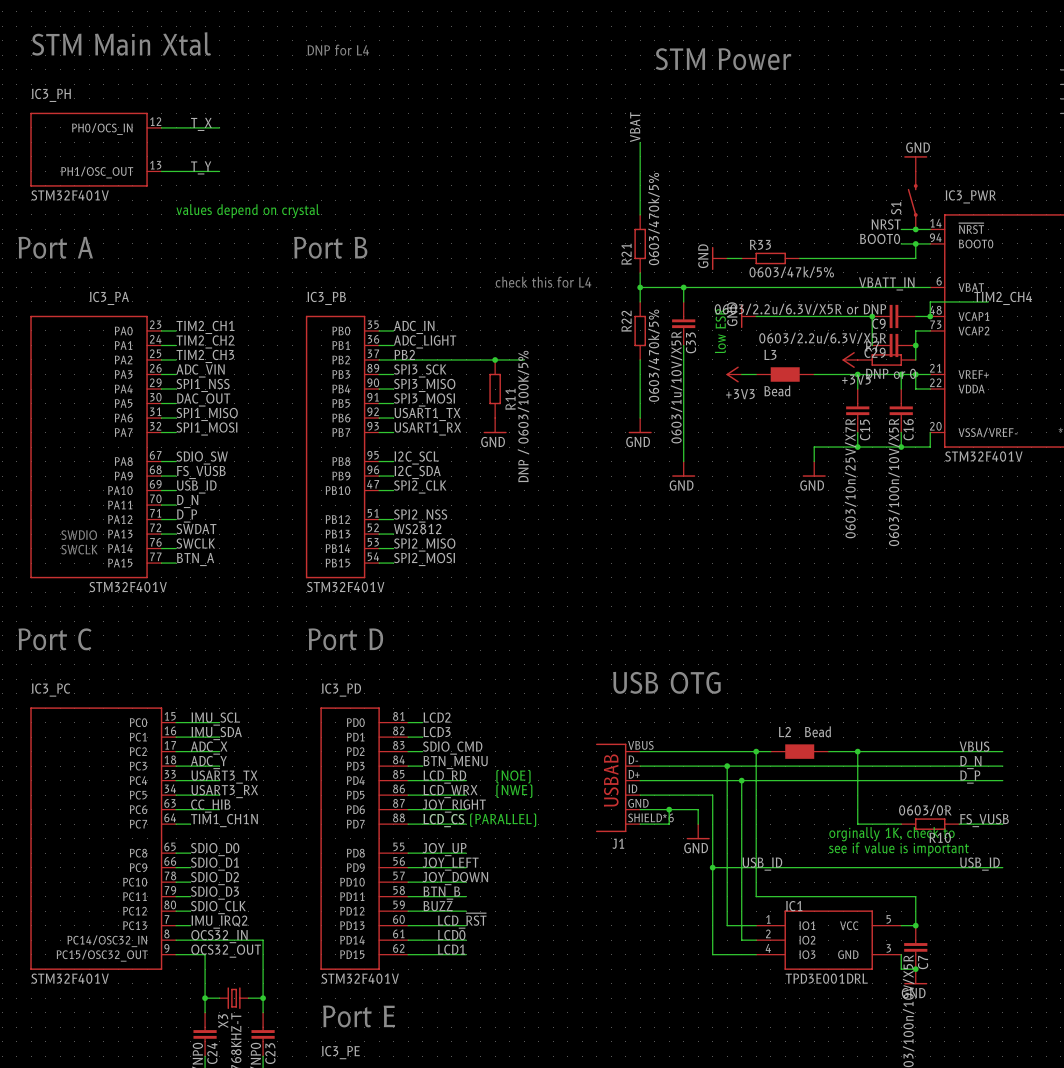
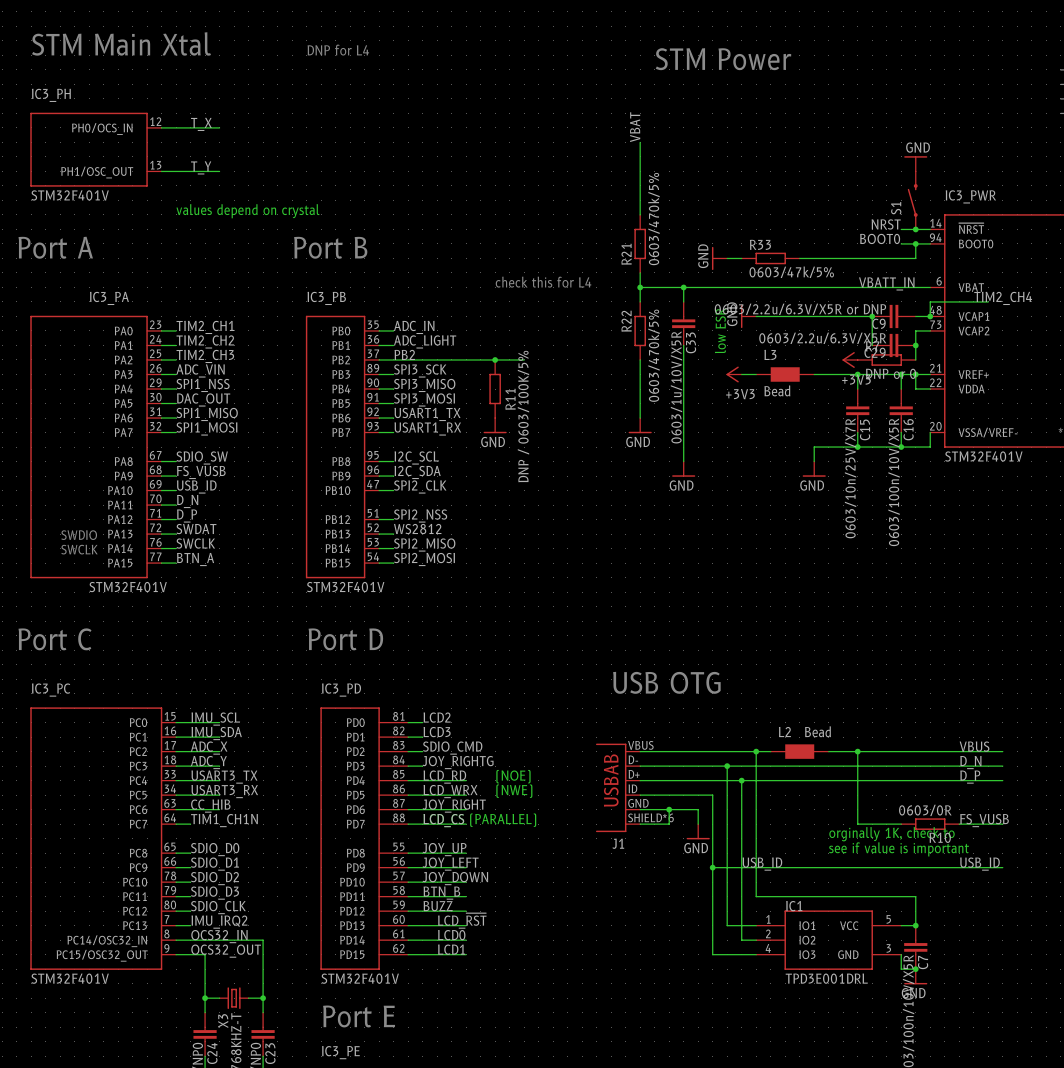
label: BTN_MENU (455, 762) -> JOY_RIGHTG (458, 762)

